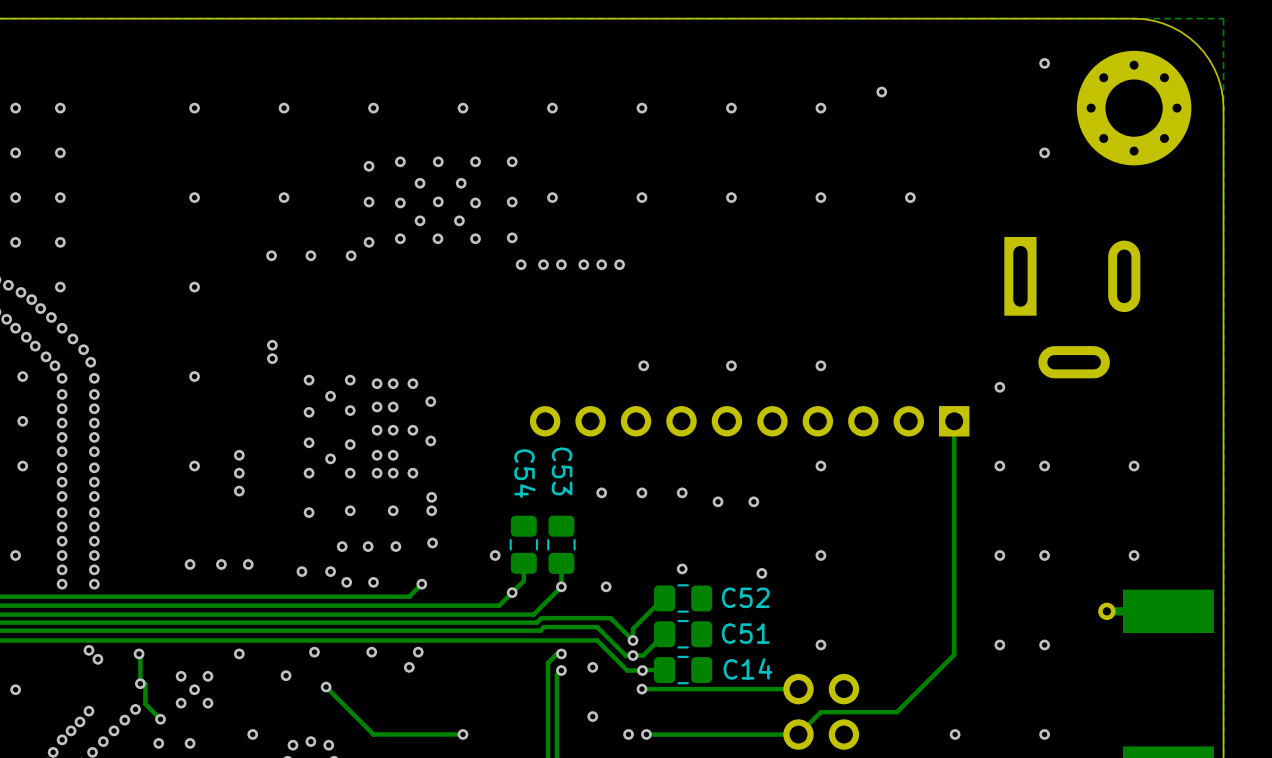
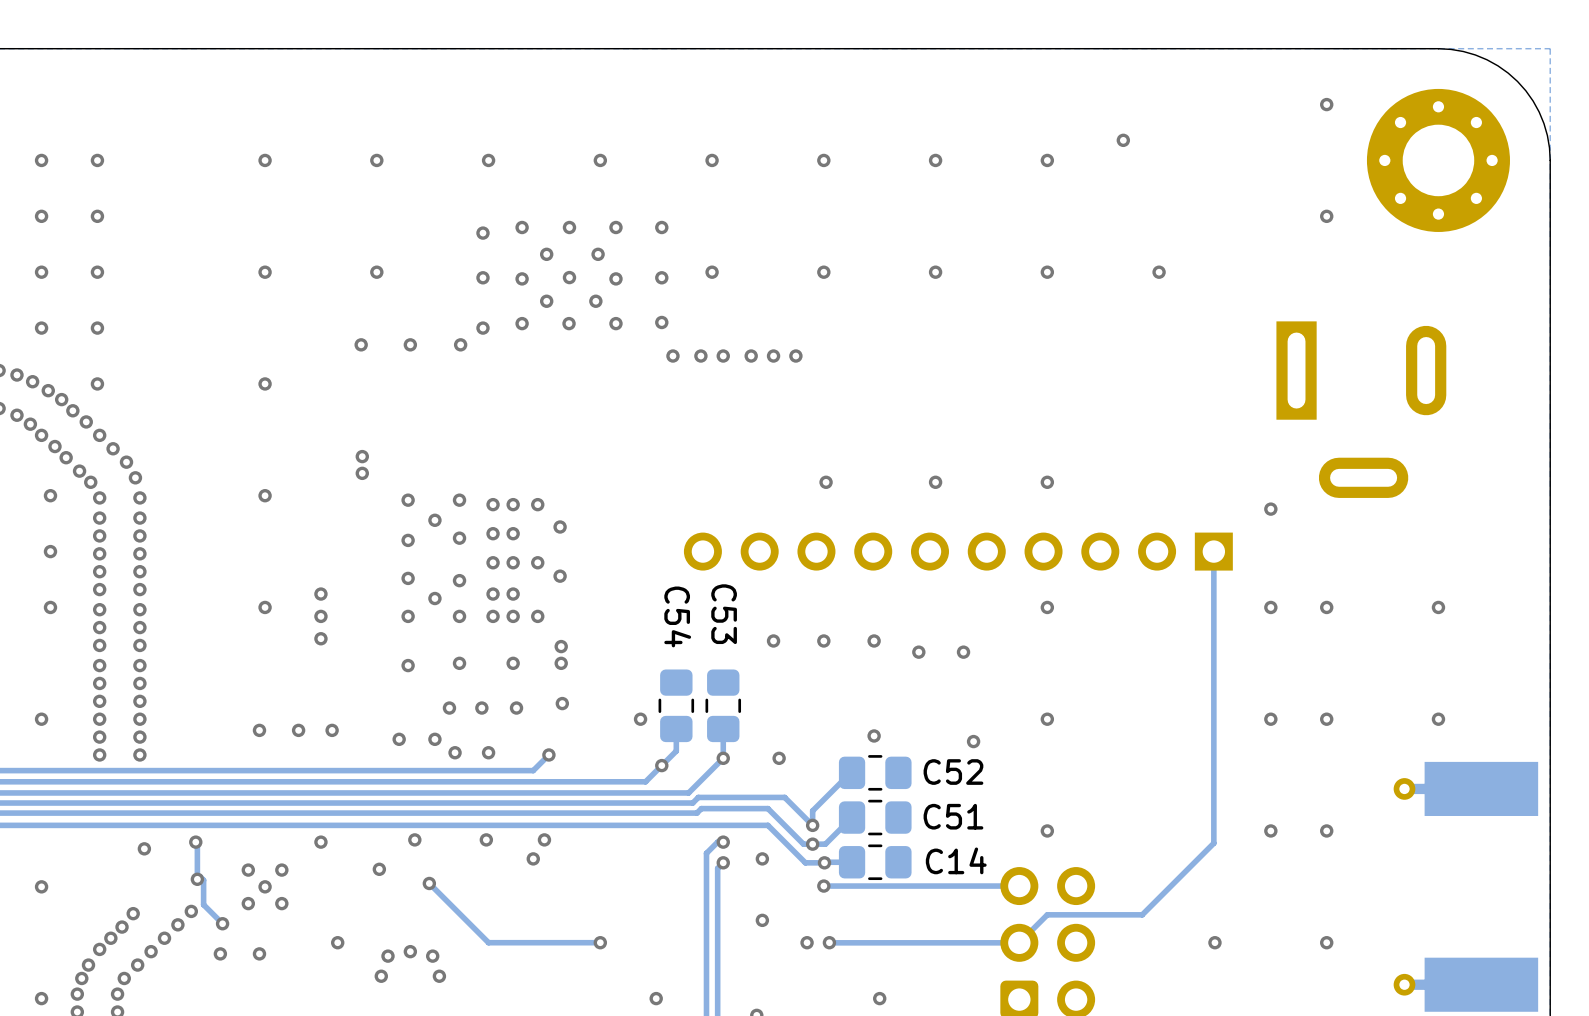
via: (88, 650) -> none

